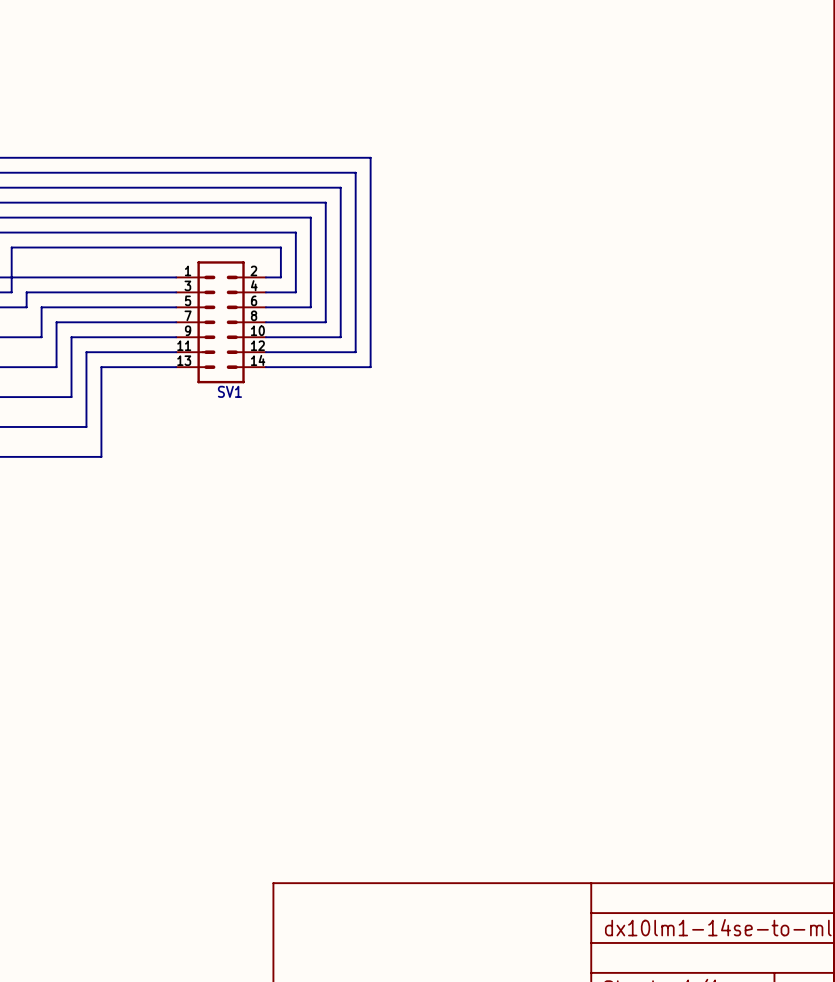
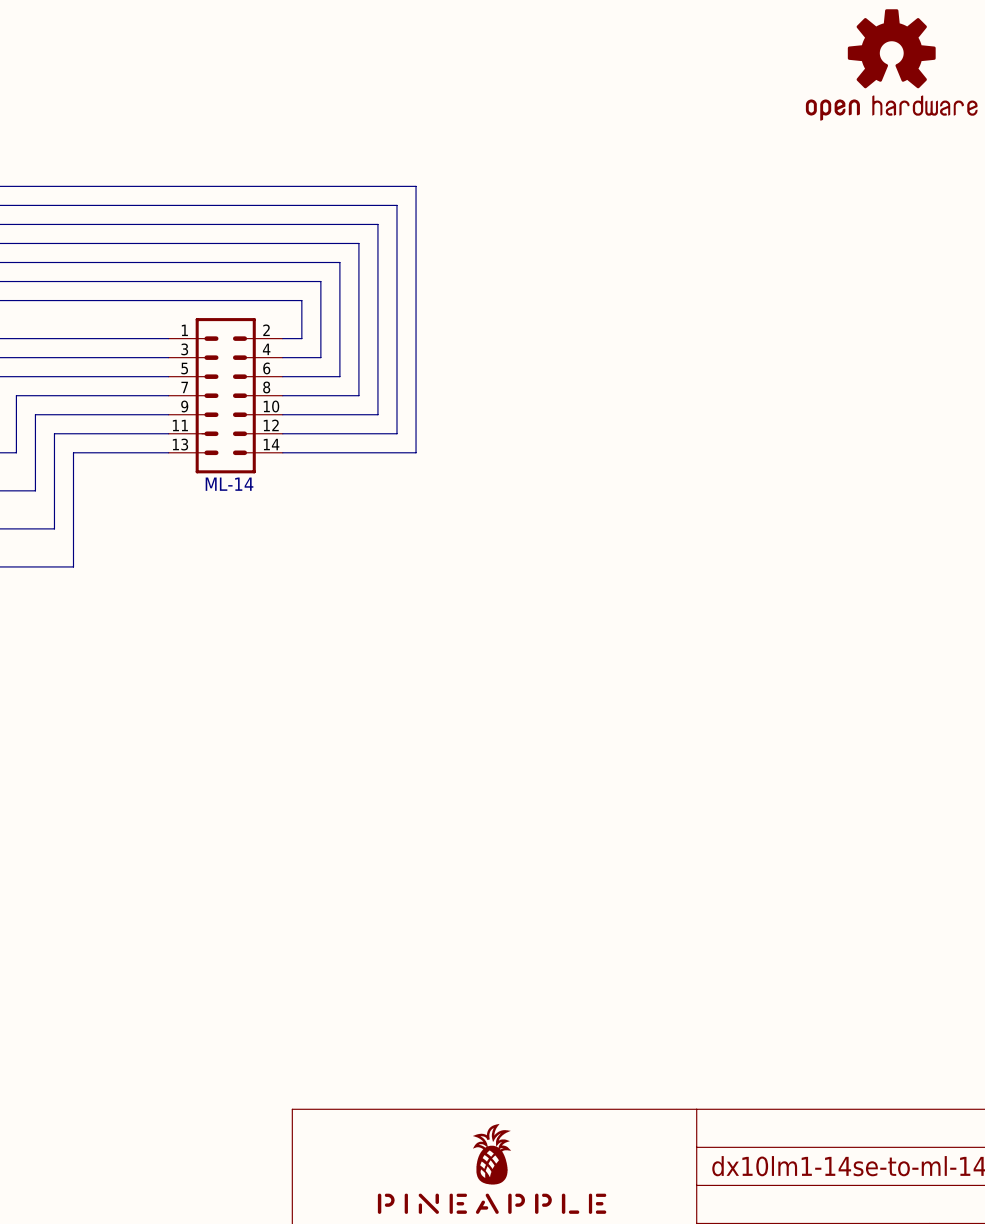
part: none -> (891, 64)
SV1 name: SV1 (229, 391) -> ML-14 (229, 484)
part: none -> (492, 1168)

